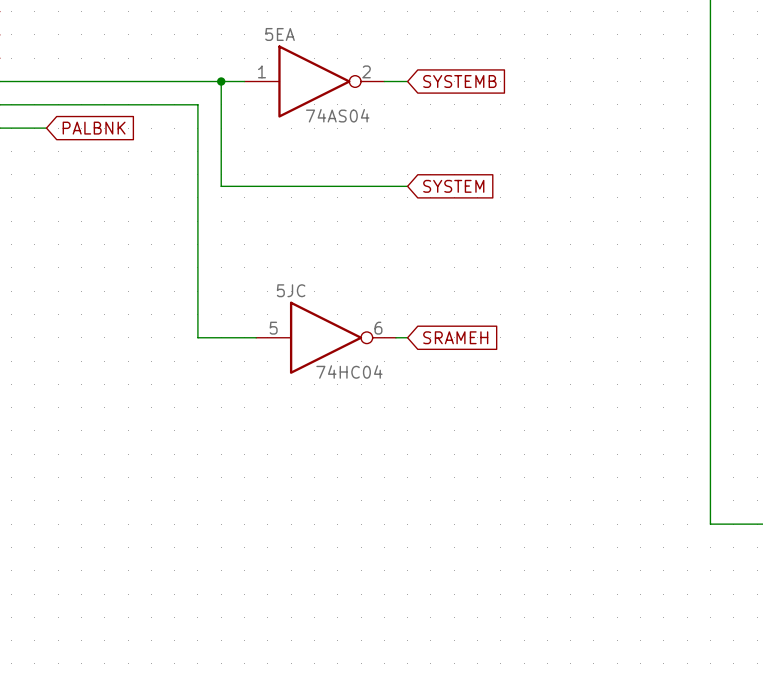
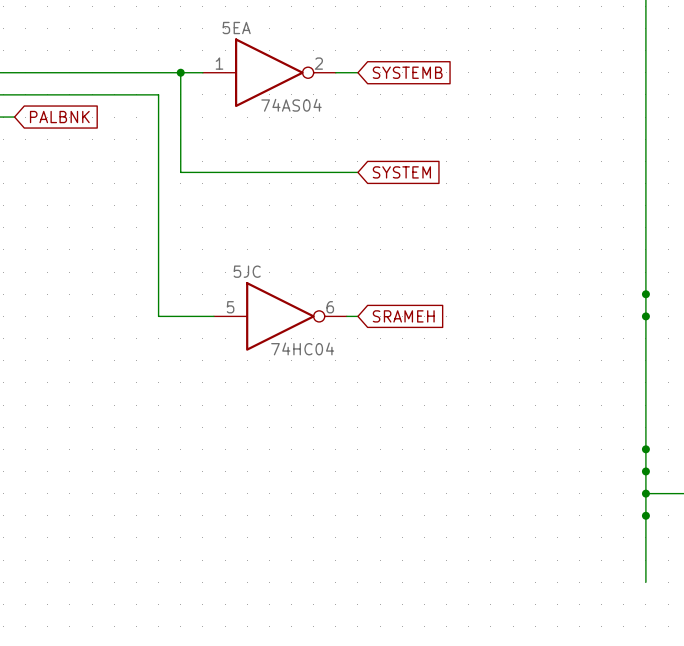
junction: none -> (645, 294)
junction: none -> (645, 316)
junction: none -> (645, 449)
junction: none -> (645, 471)
wire: none -> (645, 493) (645, 582)
junction: none -> (645, 493)
junction: none -> (645, 515)

